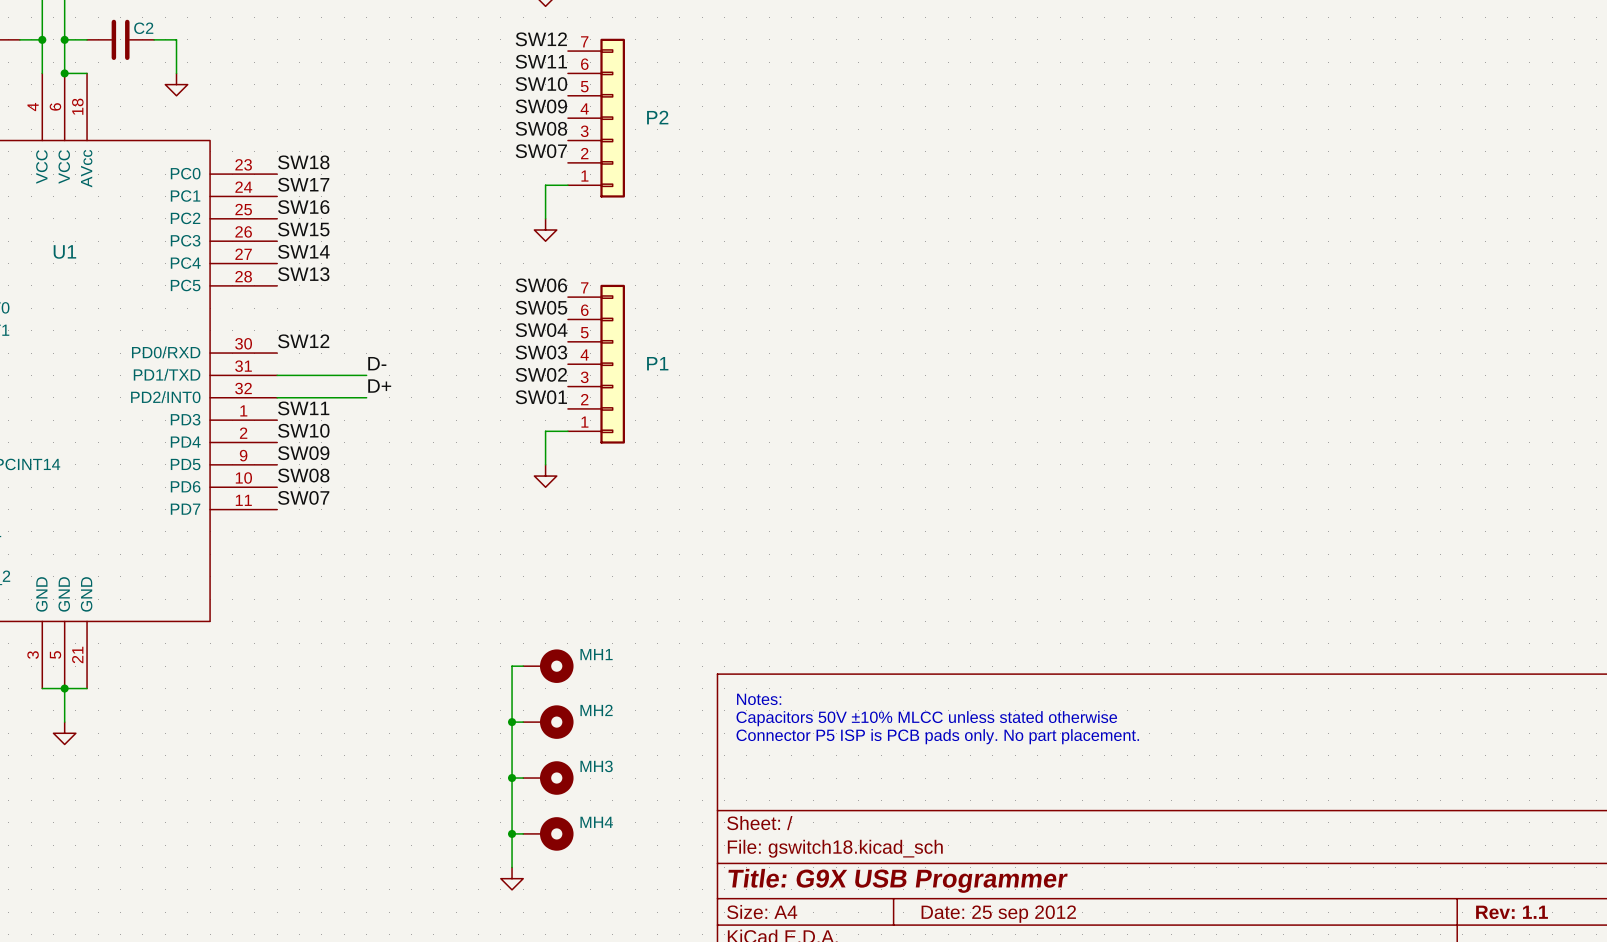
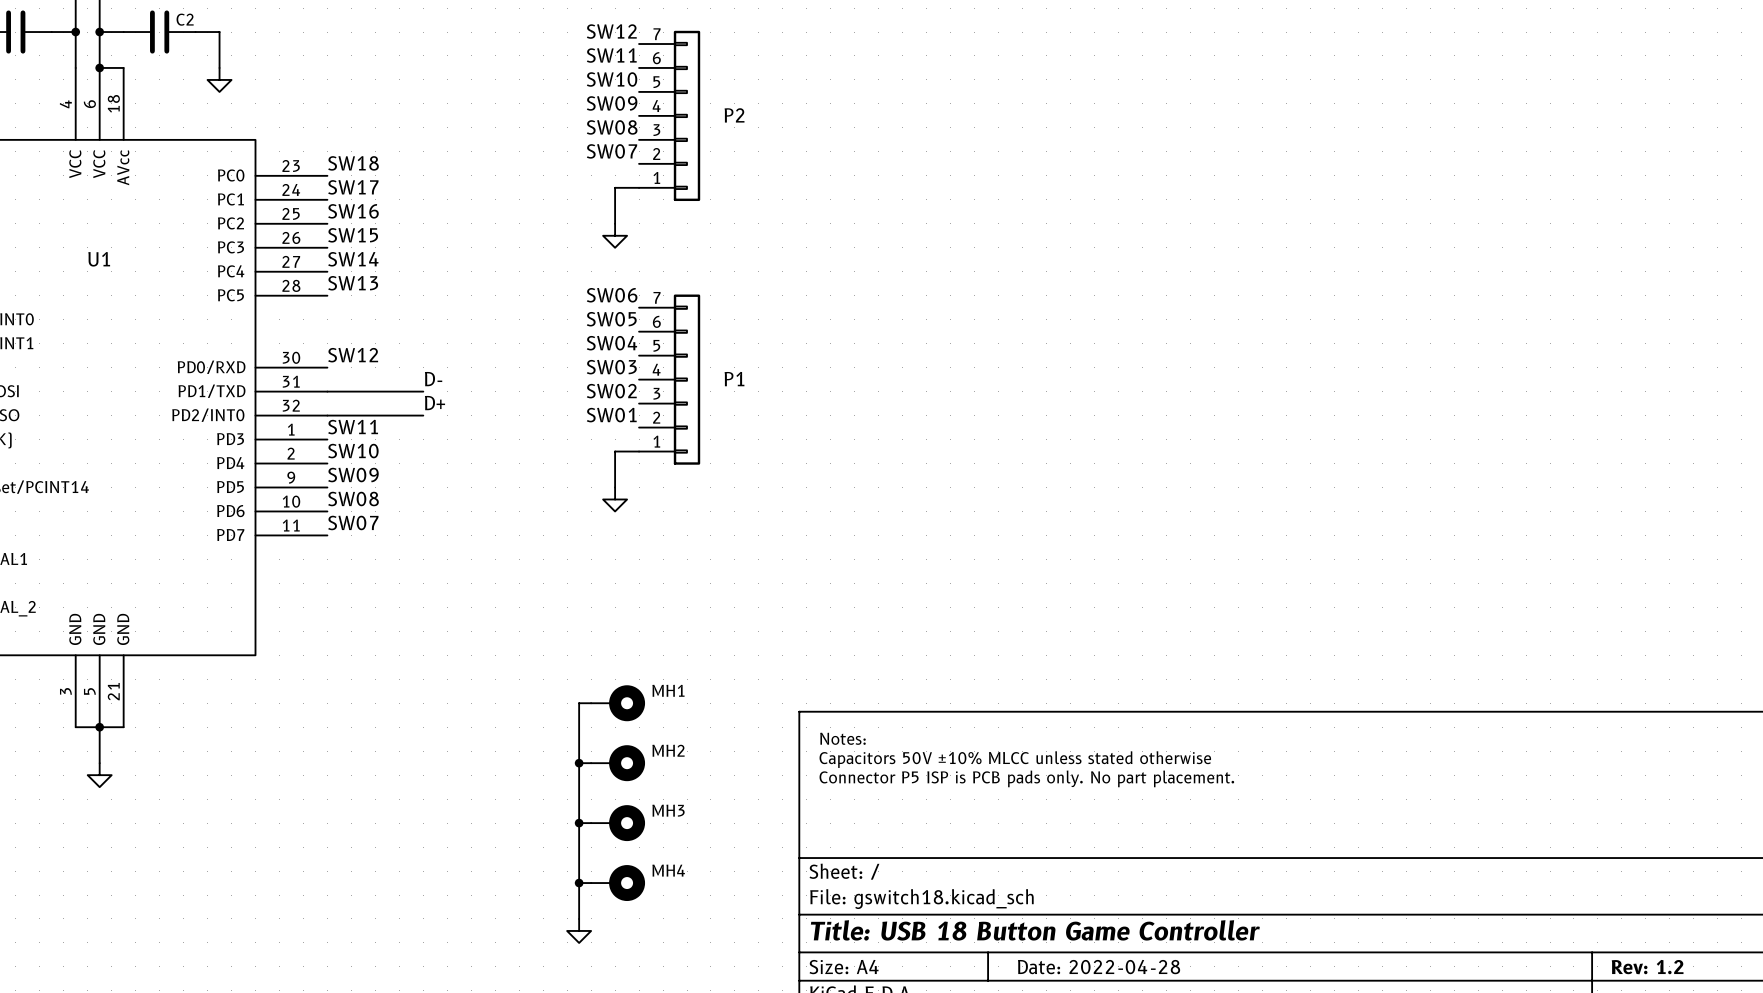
title block: Title: G9X USB Programmer (898, 880) -> Title: USB 18 Button Game Controller (1035, 930)
title block: Rev: 1.1 (1512, 912) -> Rev: 1.2 (1647, 967)
title block: Date: 25 sep 2012 (998, 914) -> Date: 2022-04-28 (1099, 967)

